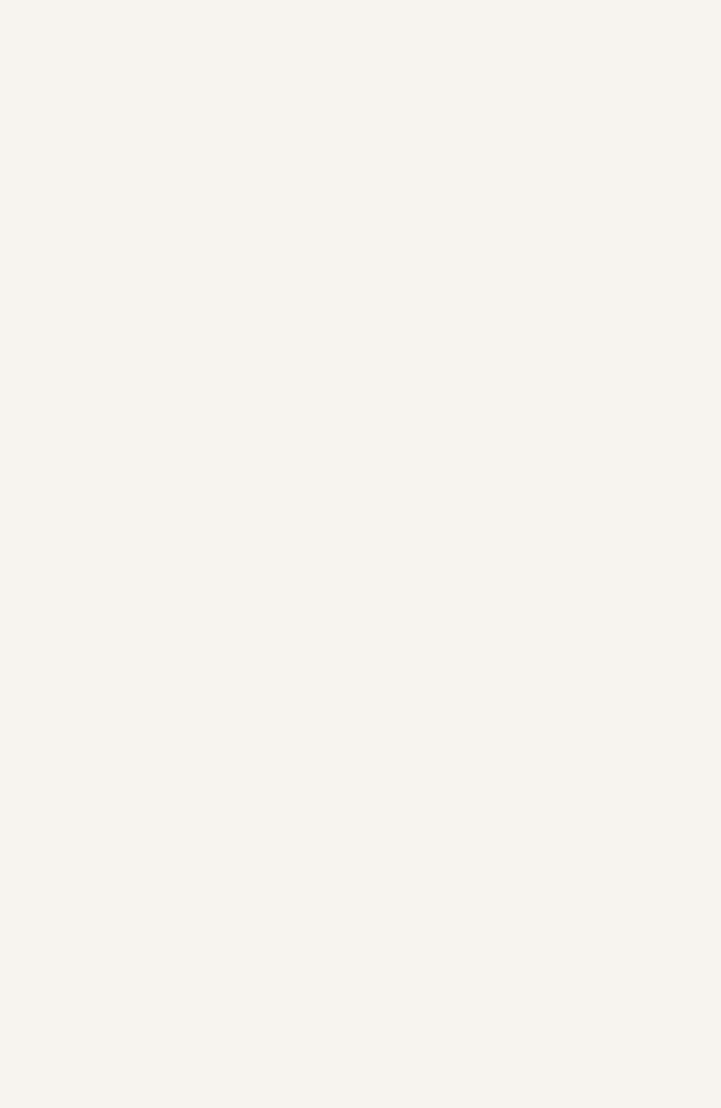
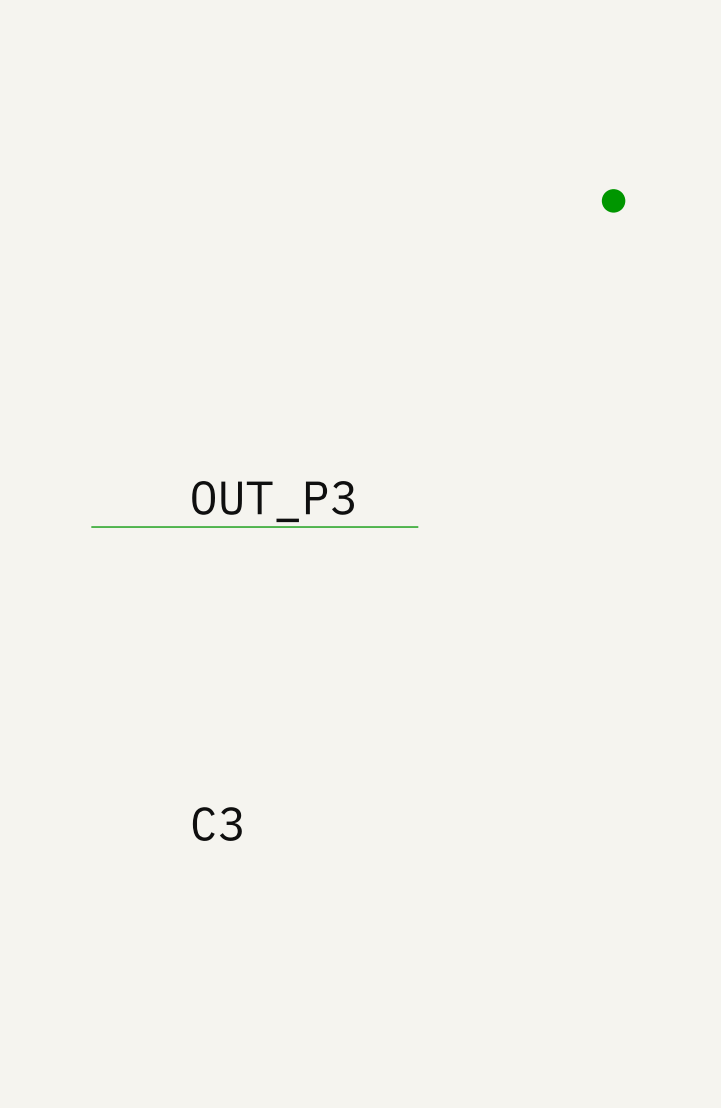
junction: none -> (613, 200)
label: none -> OUT_P3 (273, 501)
wire: none -> (91, 527) (417, 527)
label: none -> C3 (217, 824)

